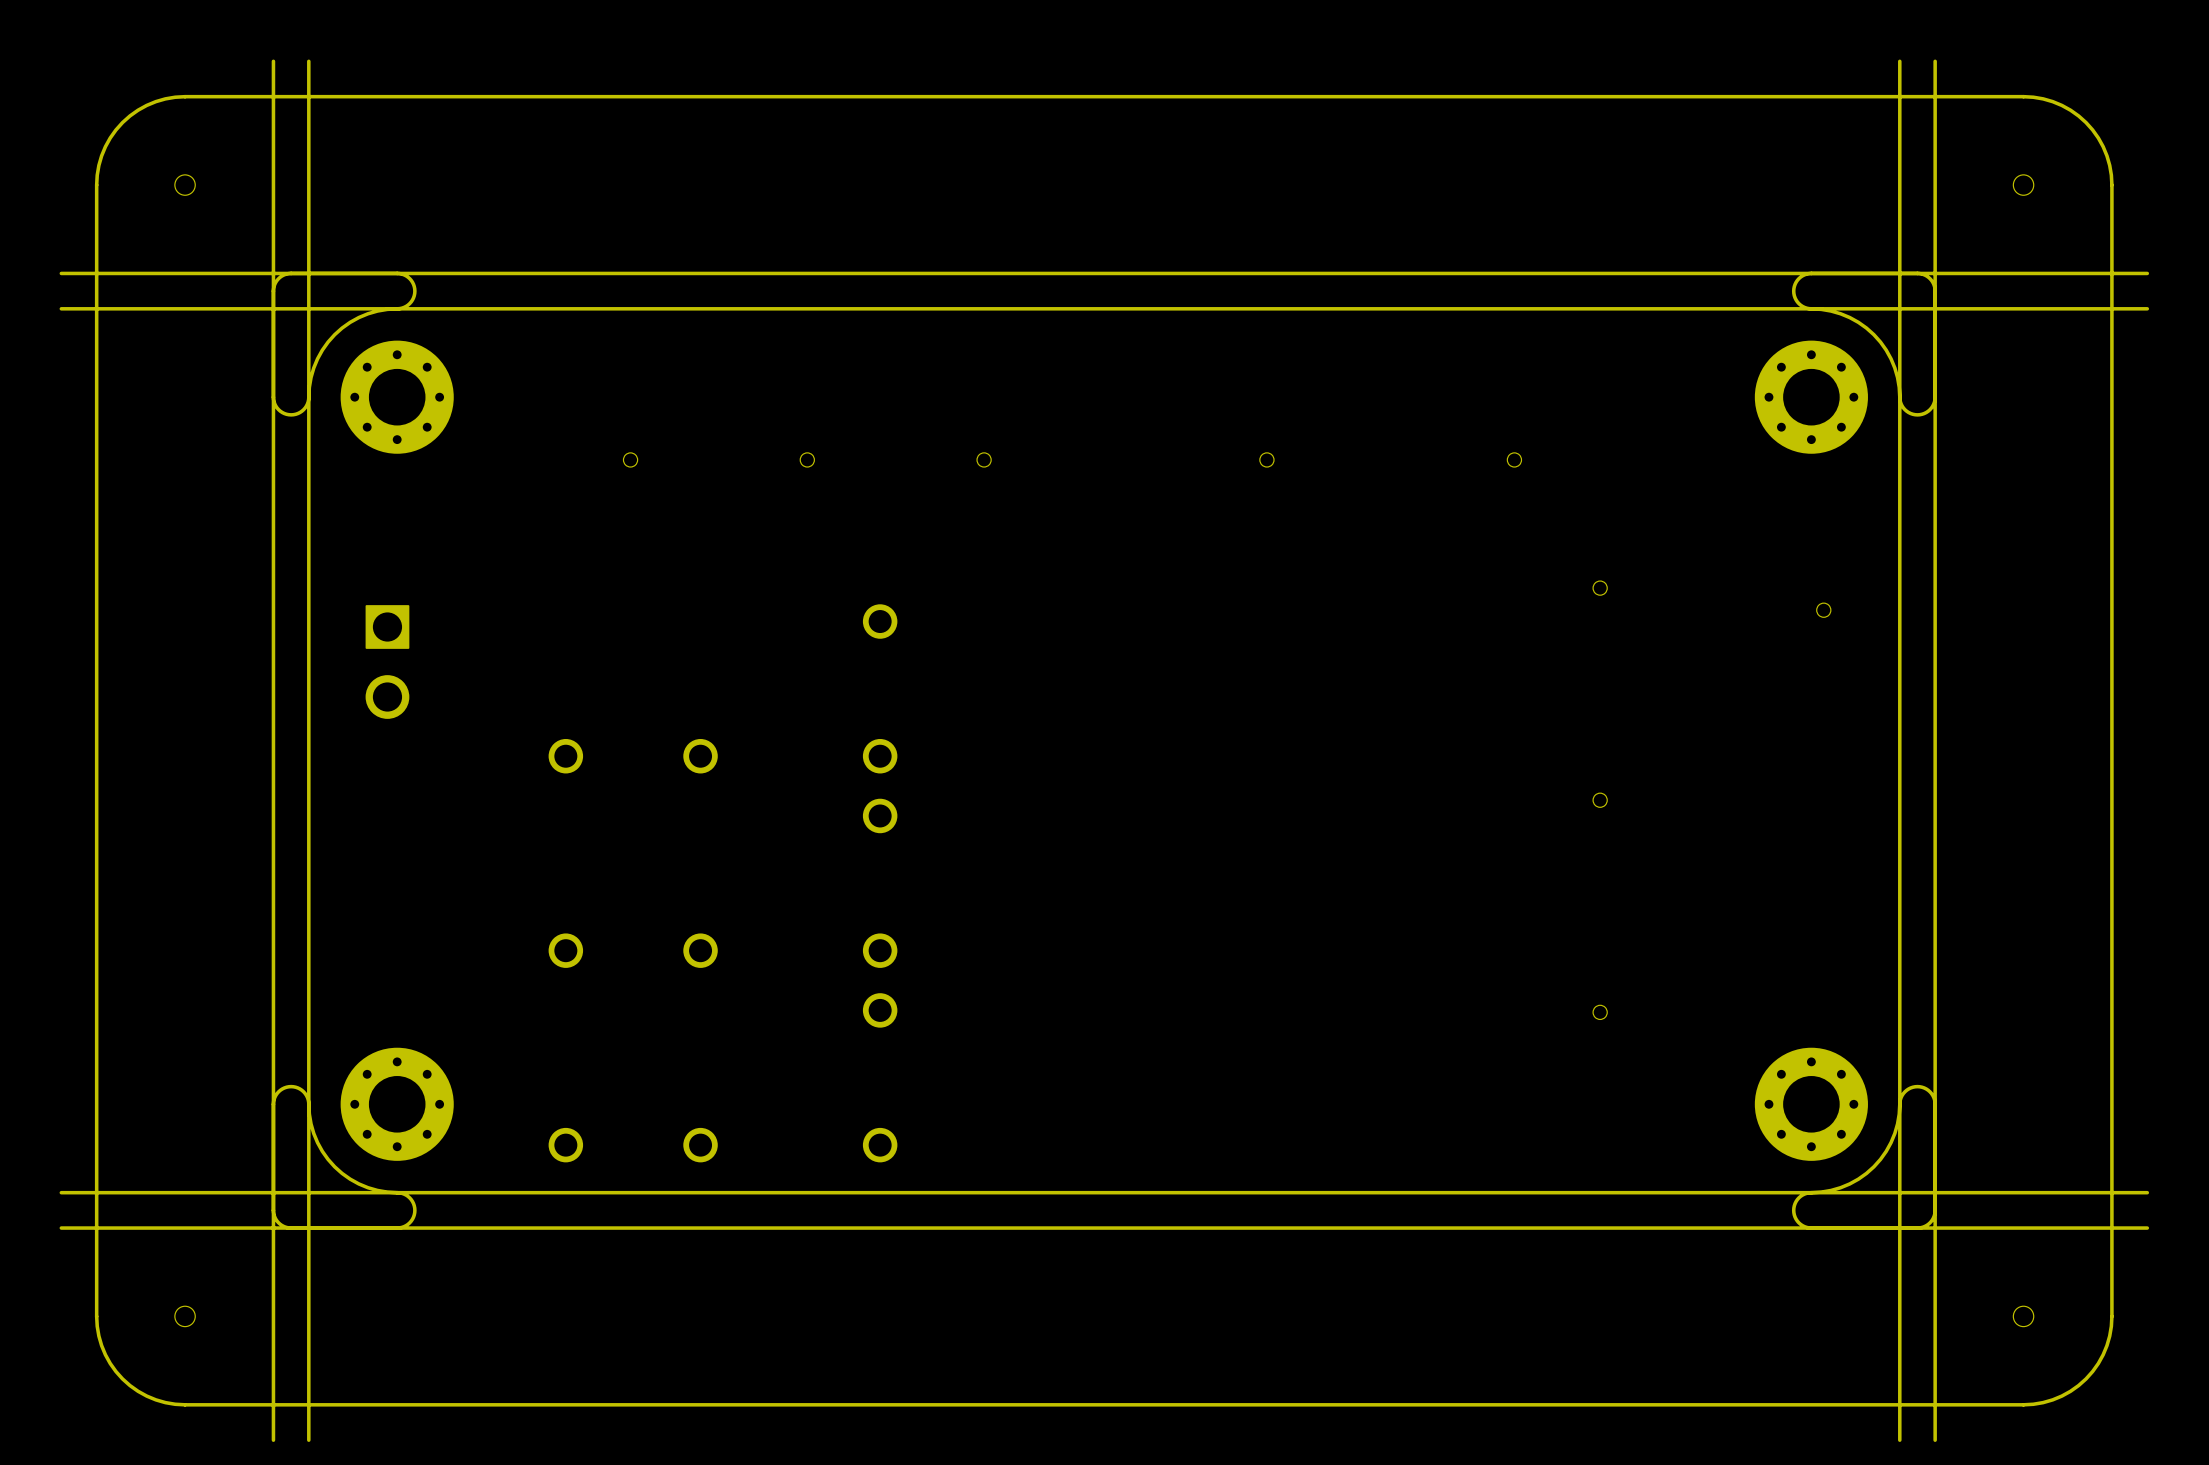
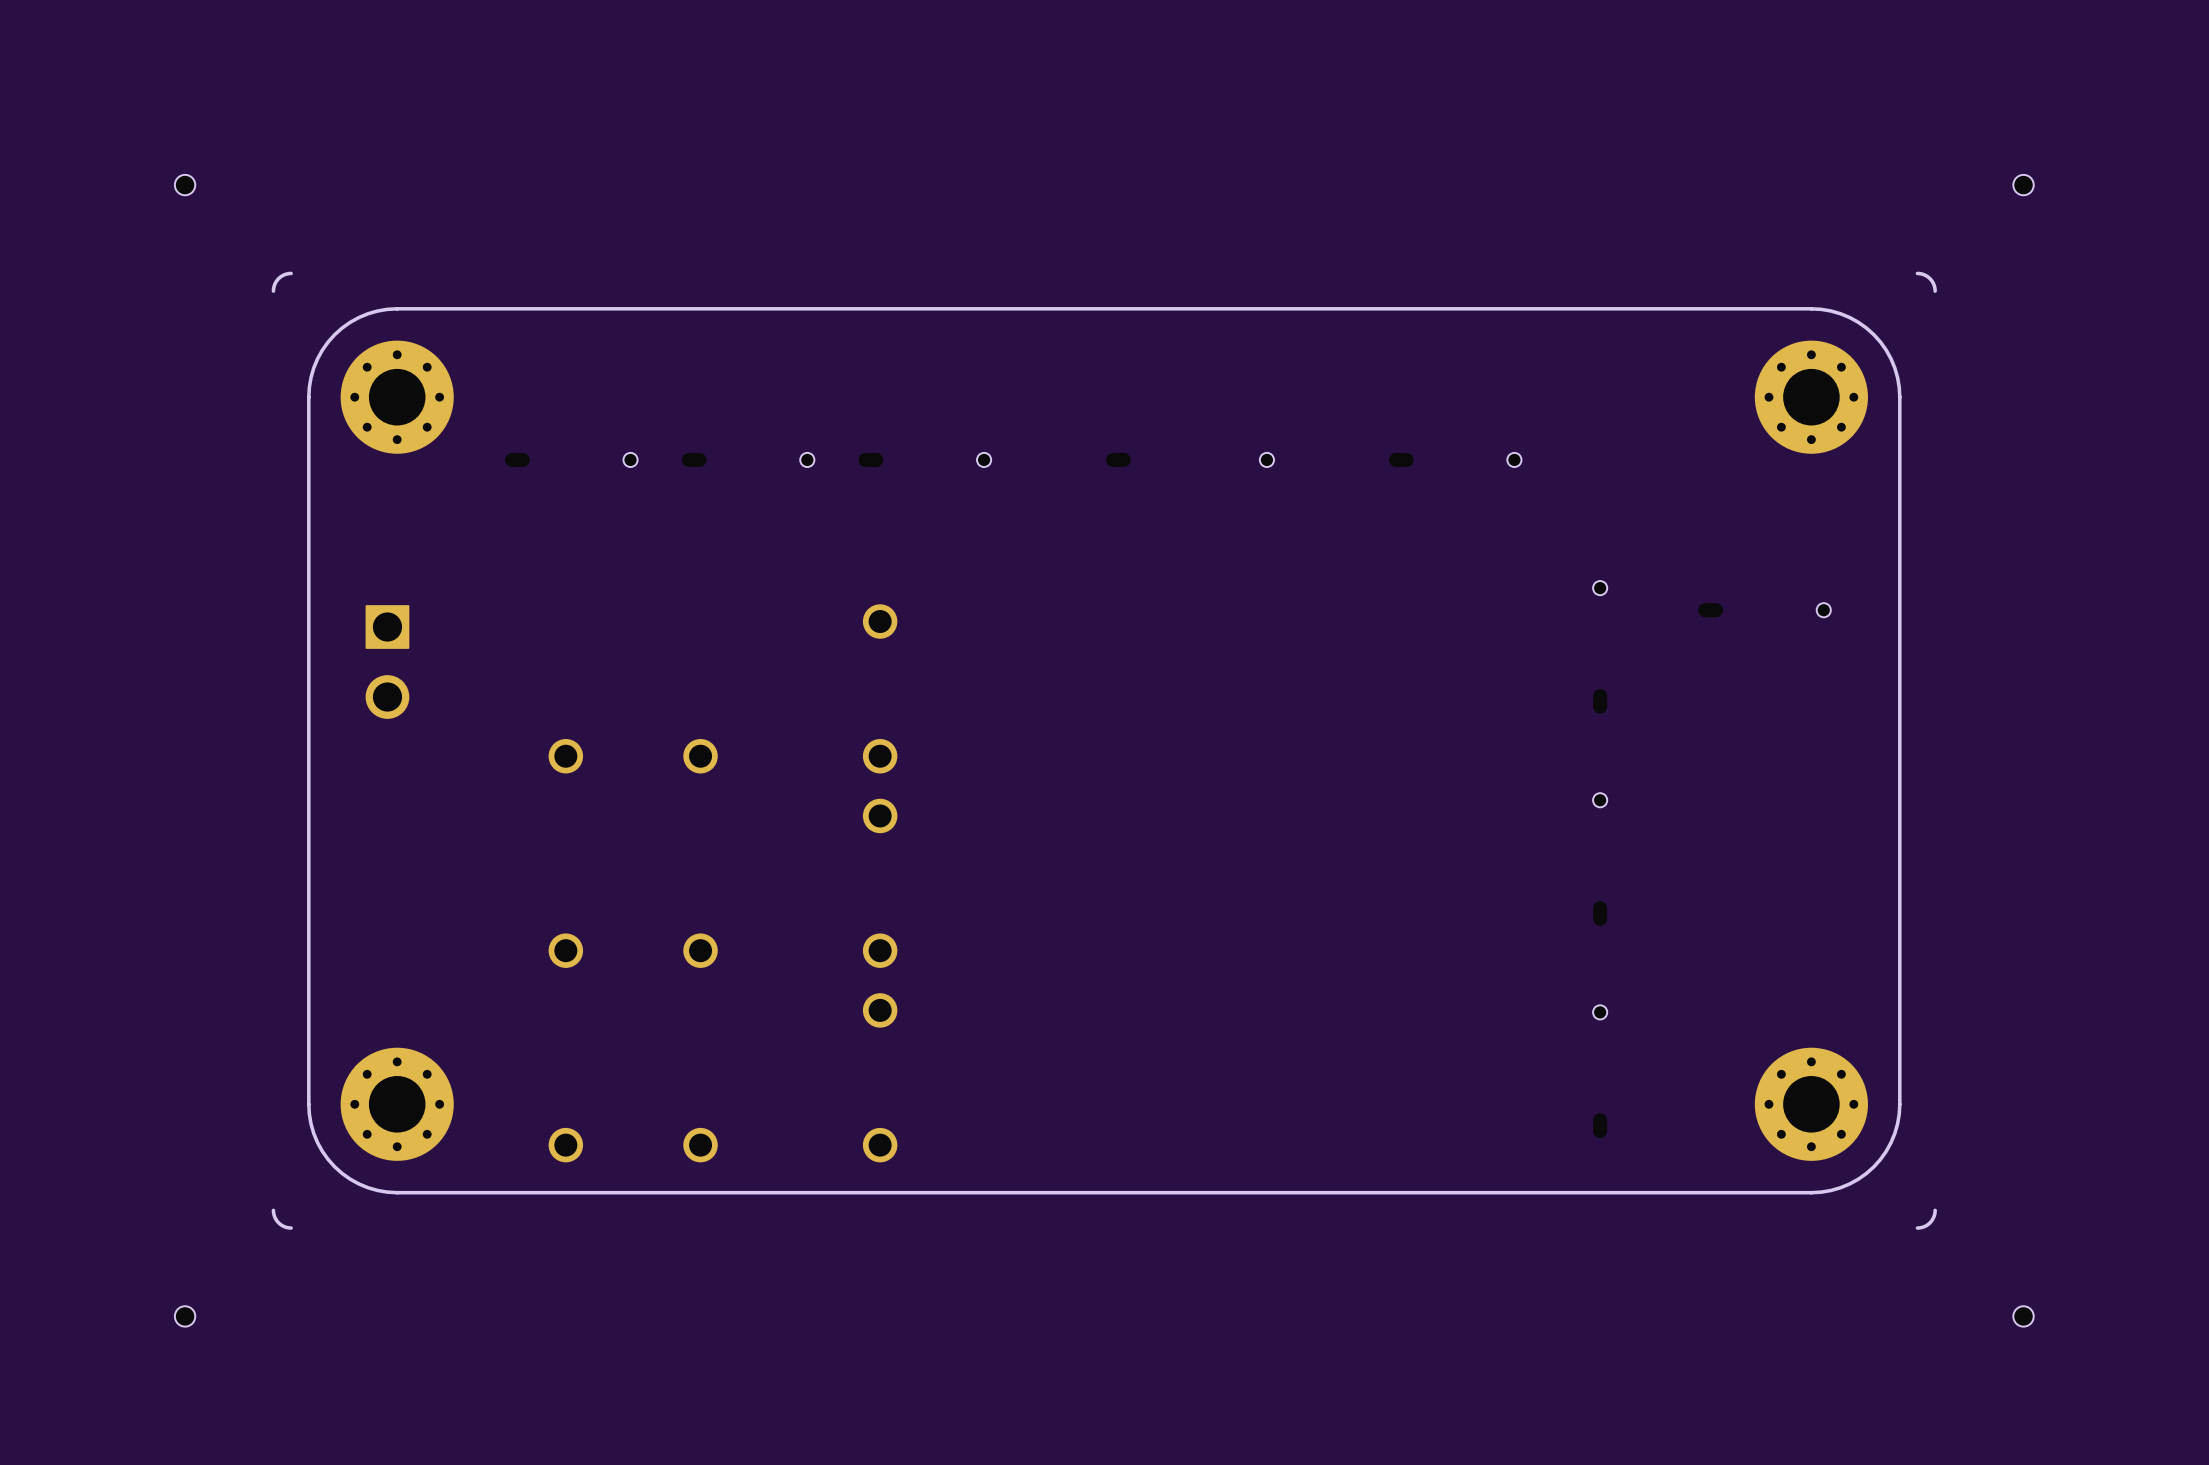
board edge: (273, 61) (273, 1440) -> none
board edge: (308, 61) (308, 399) (303, 409) (291, 414) (278, 409) (273, 397) -> none
board edge: (1899, 61) (1899, 399) (1904, 409) (1917, 414) (1929, 409) (1935, 397) -> none
board edge: (1935, 61) (1935, 1440) -> none
board edge: (2023, 96) (185, 96) (165, 98) (138, 110) (115, 129) (105, 146) (98, 165) (96, 185) (96, 1316) (98, 1336) (110, 1363) (122, 1378) (138, 1391) (155, 1399) (185, 1404) (2023, 1404) (2052, 1399) (2070, 1391) (2086, 1378) (2103, 1354) (2109, 1336) (2111, 1316) (2111, 185) (2106, 155) (2098, 138) (2086, 122) (2061, 105) (2043, 98) (2023, 96) -> none
board edge: (397, 273) (409, 278) (414, 291) (409, 303) (399, 308) (61, 308) -> none
board edge: (1811, 273) (1798, 278) (1793, 291) (1798, 303) (1809, 308) (2147, 308) -> none
board edge: (2147, 273) (61, 273) -> none
board edge: (273, 1104) (278, 1091) (291, 1086) (303, 1091) (308, 1101) (308, 1440) -> none
board edge: (1935, 1104) (1929, 1091) (1917, 1086) (1904, 1091) (1899, 1101) (1899, 1440) -> none
board edge: (61, 1192) (399, 1192) (409, 1197) (414, 1210) (409, 1222) (397, 1228) -> none
board edge: (2147, 1192) (1809, 1192) (1797, 1199) (1793, 1210) (1798, 1222) (1811, 1228) -> none
board edge: (2147, 1228) (61, 1228) -> none

